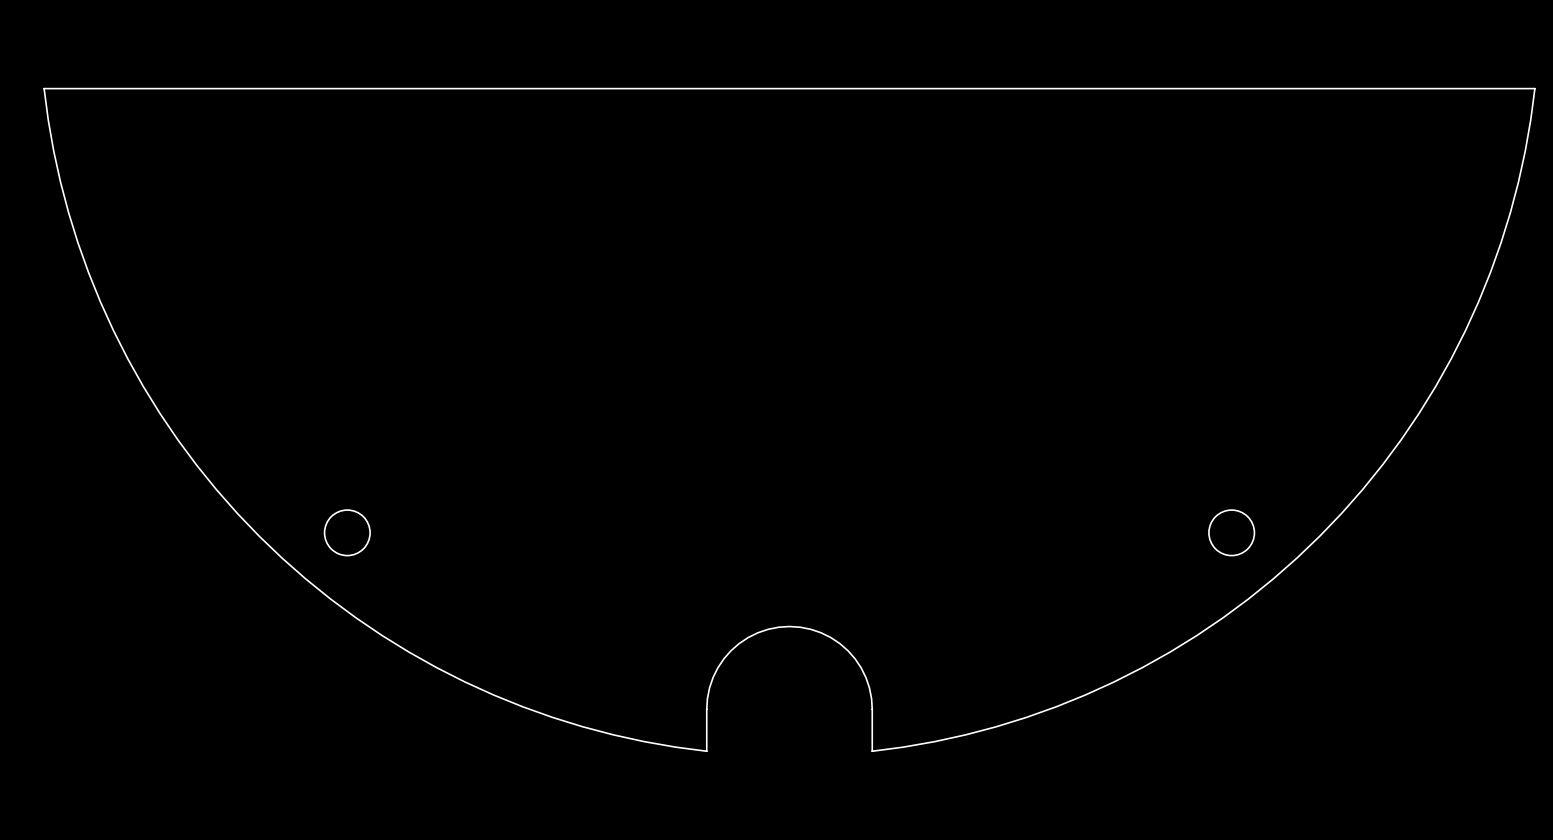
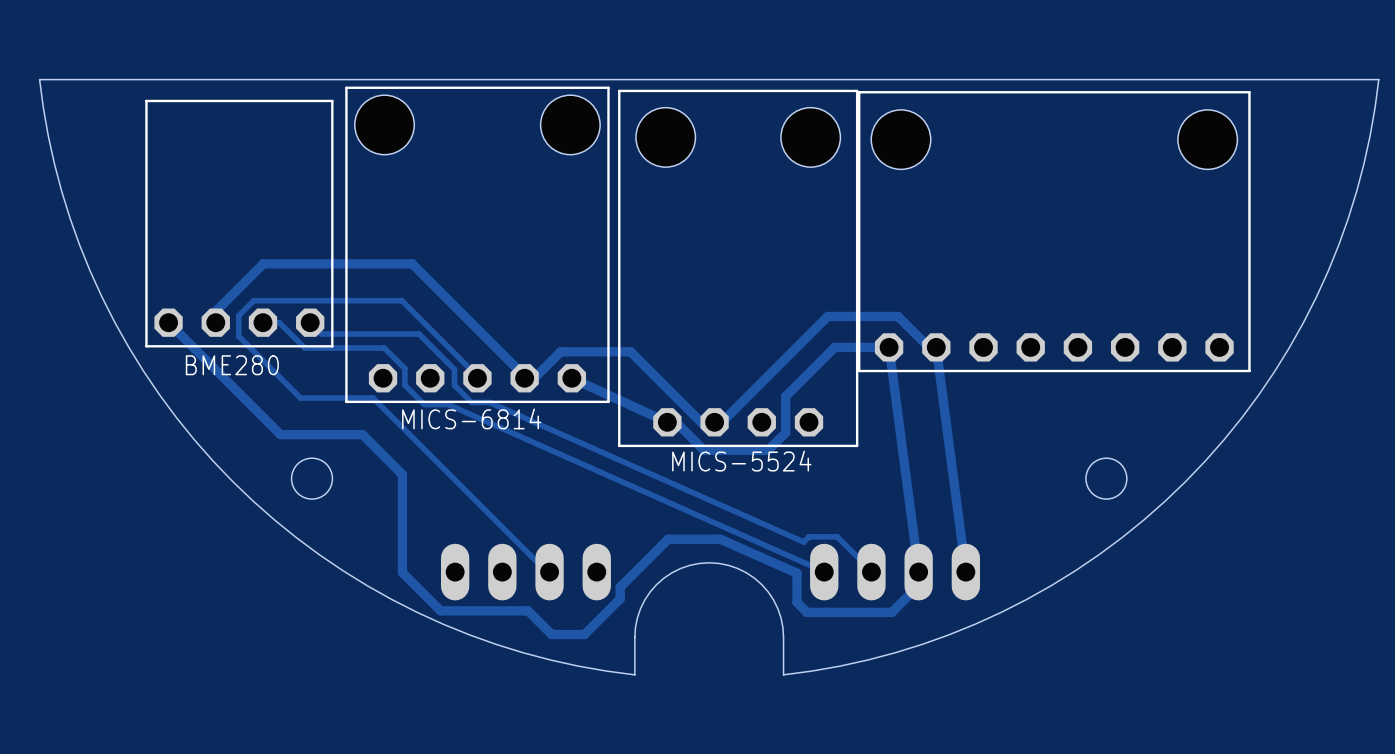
BME280: none -> (239, 223)
part: none -> (1054, 231)
MICS-6814: none -> (477, 244)
MICS-5524: none -> (738, 268)
track: none -> (168, 322) (280, 434) (362, 434) (402, 474) (402, 572) (440, 610) (528, 610) (551, 634) (584, 634) (620, 598) (620, 587) (668, 539) (720, 539) (797, 573) (797, 602) (806, 612) (891, 612) (918, 585) (918, 572) (889, 347) (834, 347) (785, 396) (785, 432) (768, 450) (704, 450) (676, 422) (667, 422) (571, 378)
track: none -> (215, 322) (215, 311) (263, 263) (412, 263) (524, 378) (534, 378) (560, 351) (630, 351) (701, 422) (721, 422) (827, 316) (898, 316) (929, 347) (936, 347) (965, 572)
track: none -> (262, 322) (279, 322) (304, 348) (384, 348) (404, 368) (404, 385) (424, 404) (448, 404) (824, 572)
track: none -> (310, 322) (321, 334) (419, 334) (454, 369) (454, 385) (471, 402) (489, 402) (803, 542) (808, 536) (837, 536) (871, 572)
track: none -> (477, 378) (401, 300) (253, 300) (238, 315) (238, 336) (300, 398) (373, 398) (546, 571) (549, 572)
part: none -> (525, 572)
part: none -> (895, 572)

